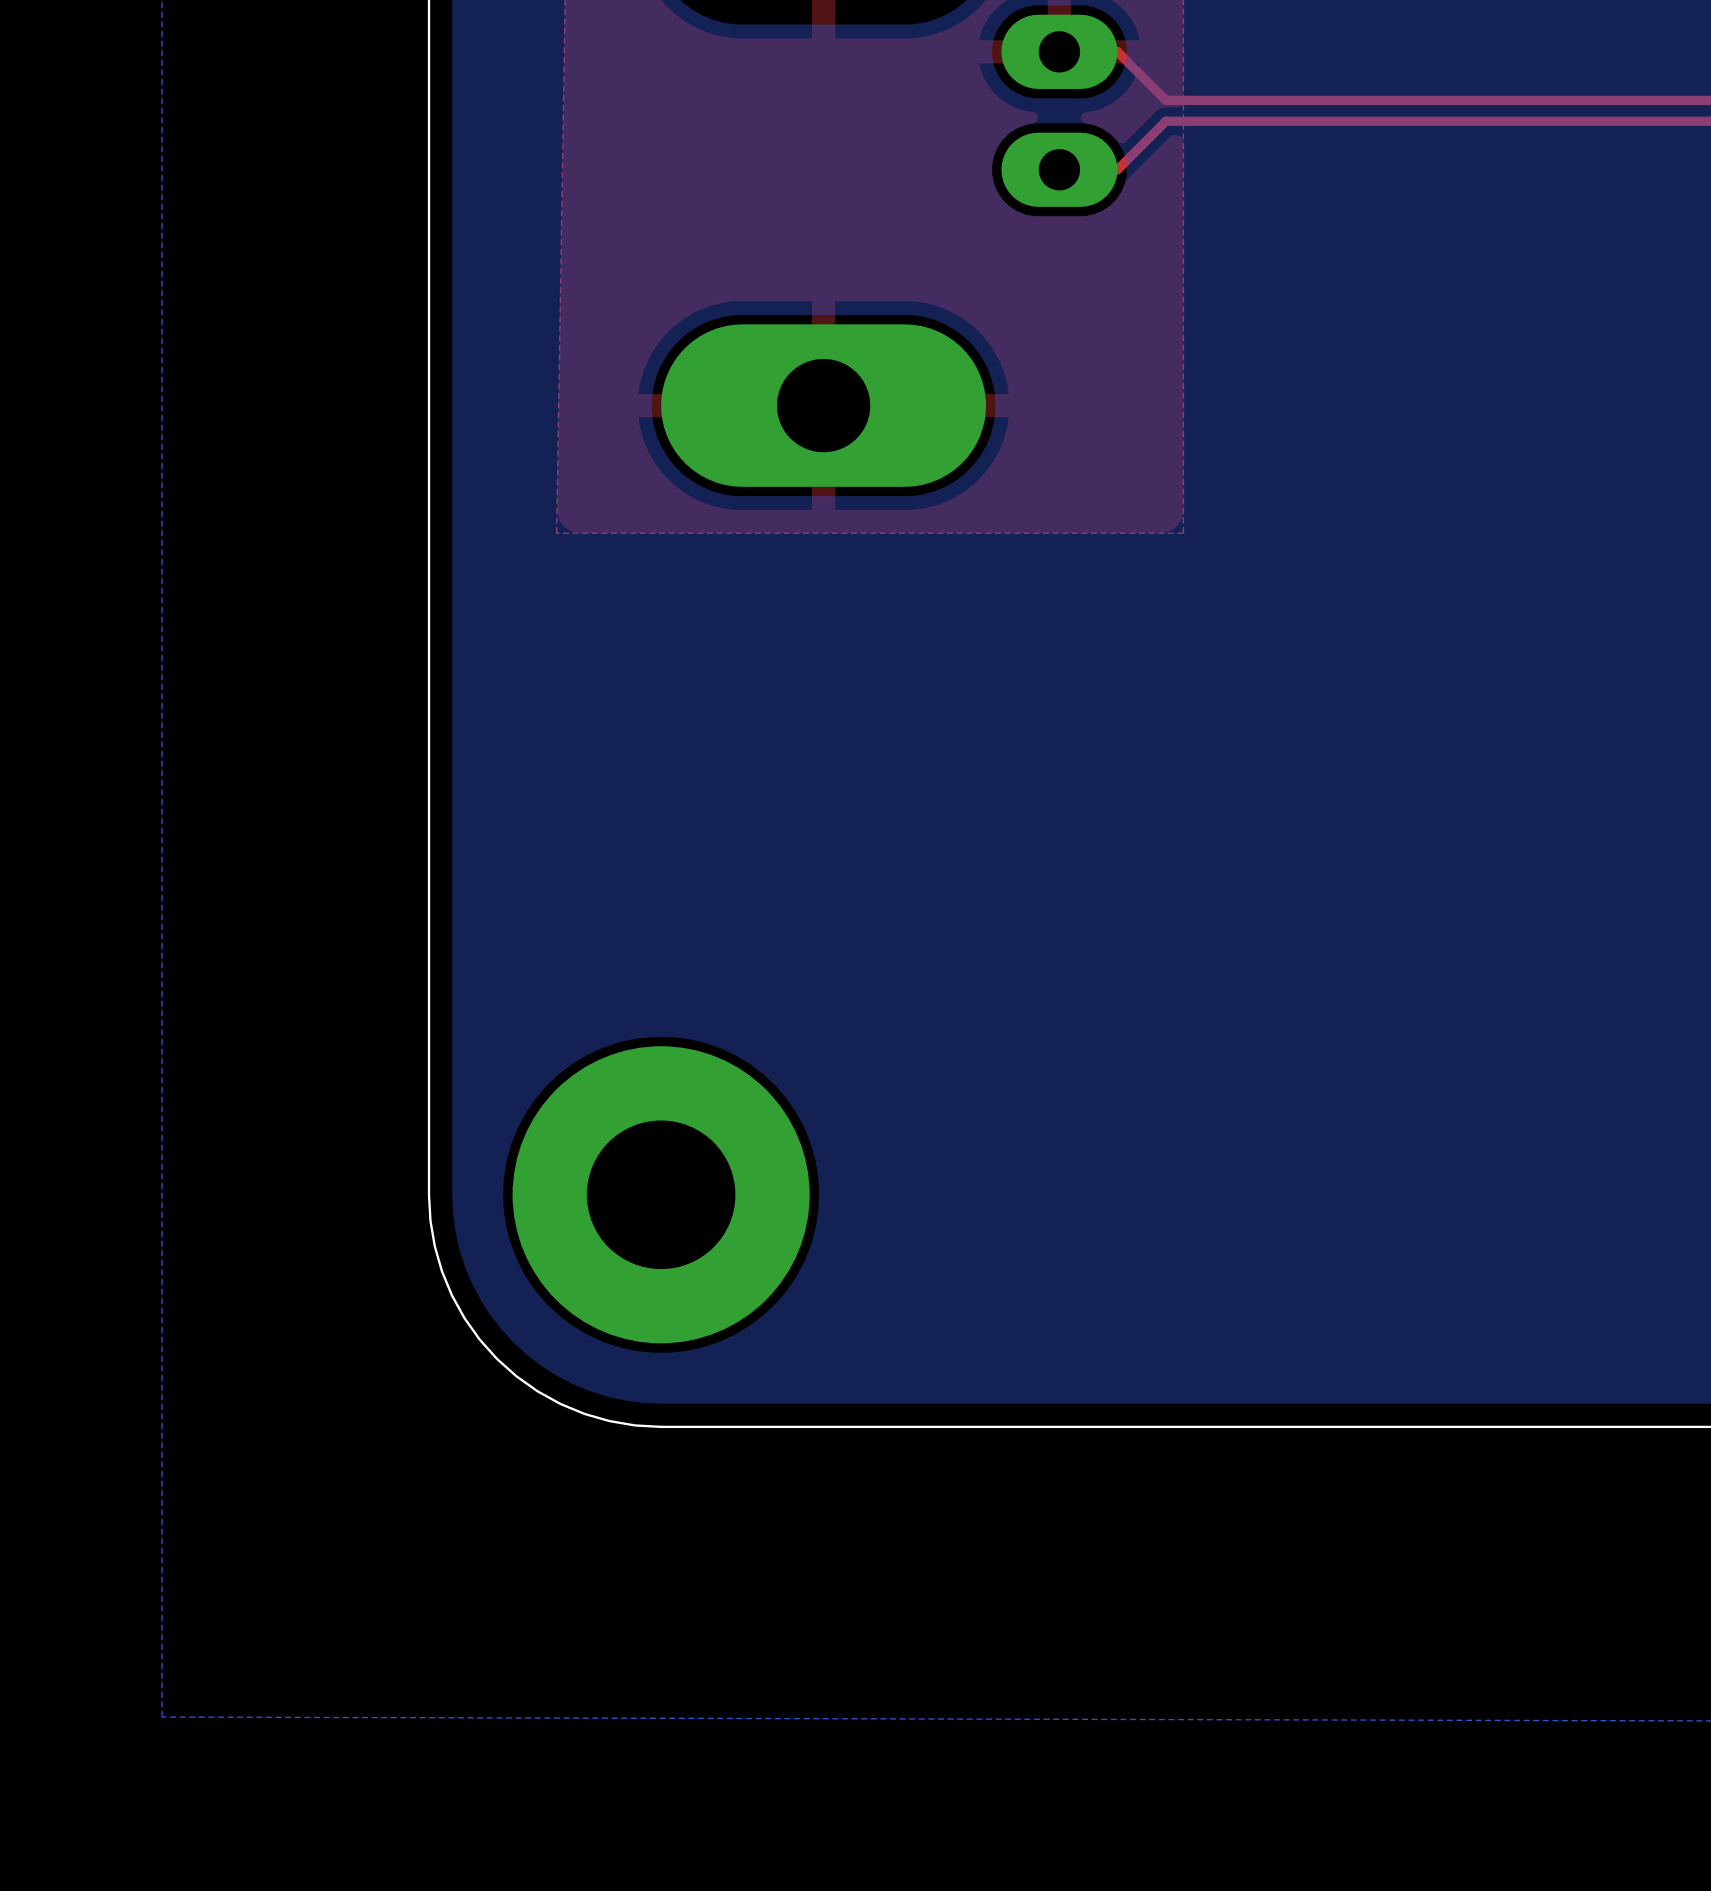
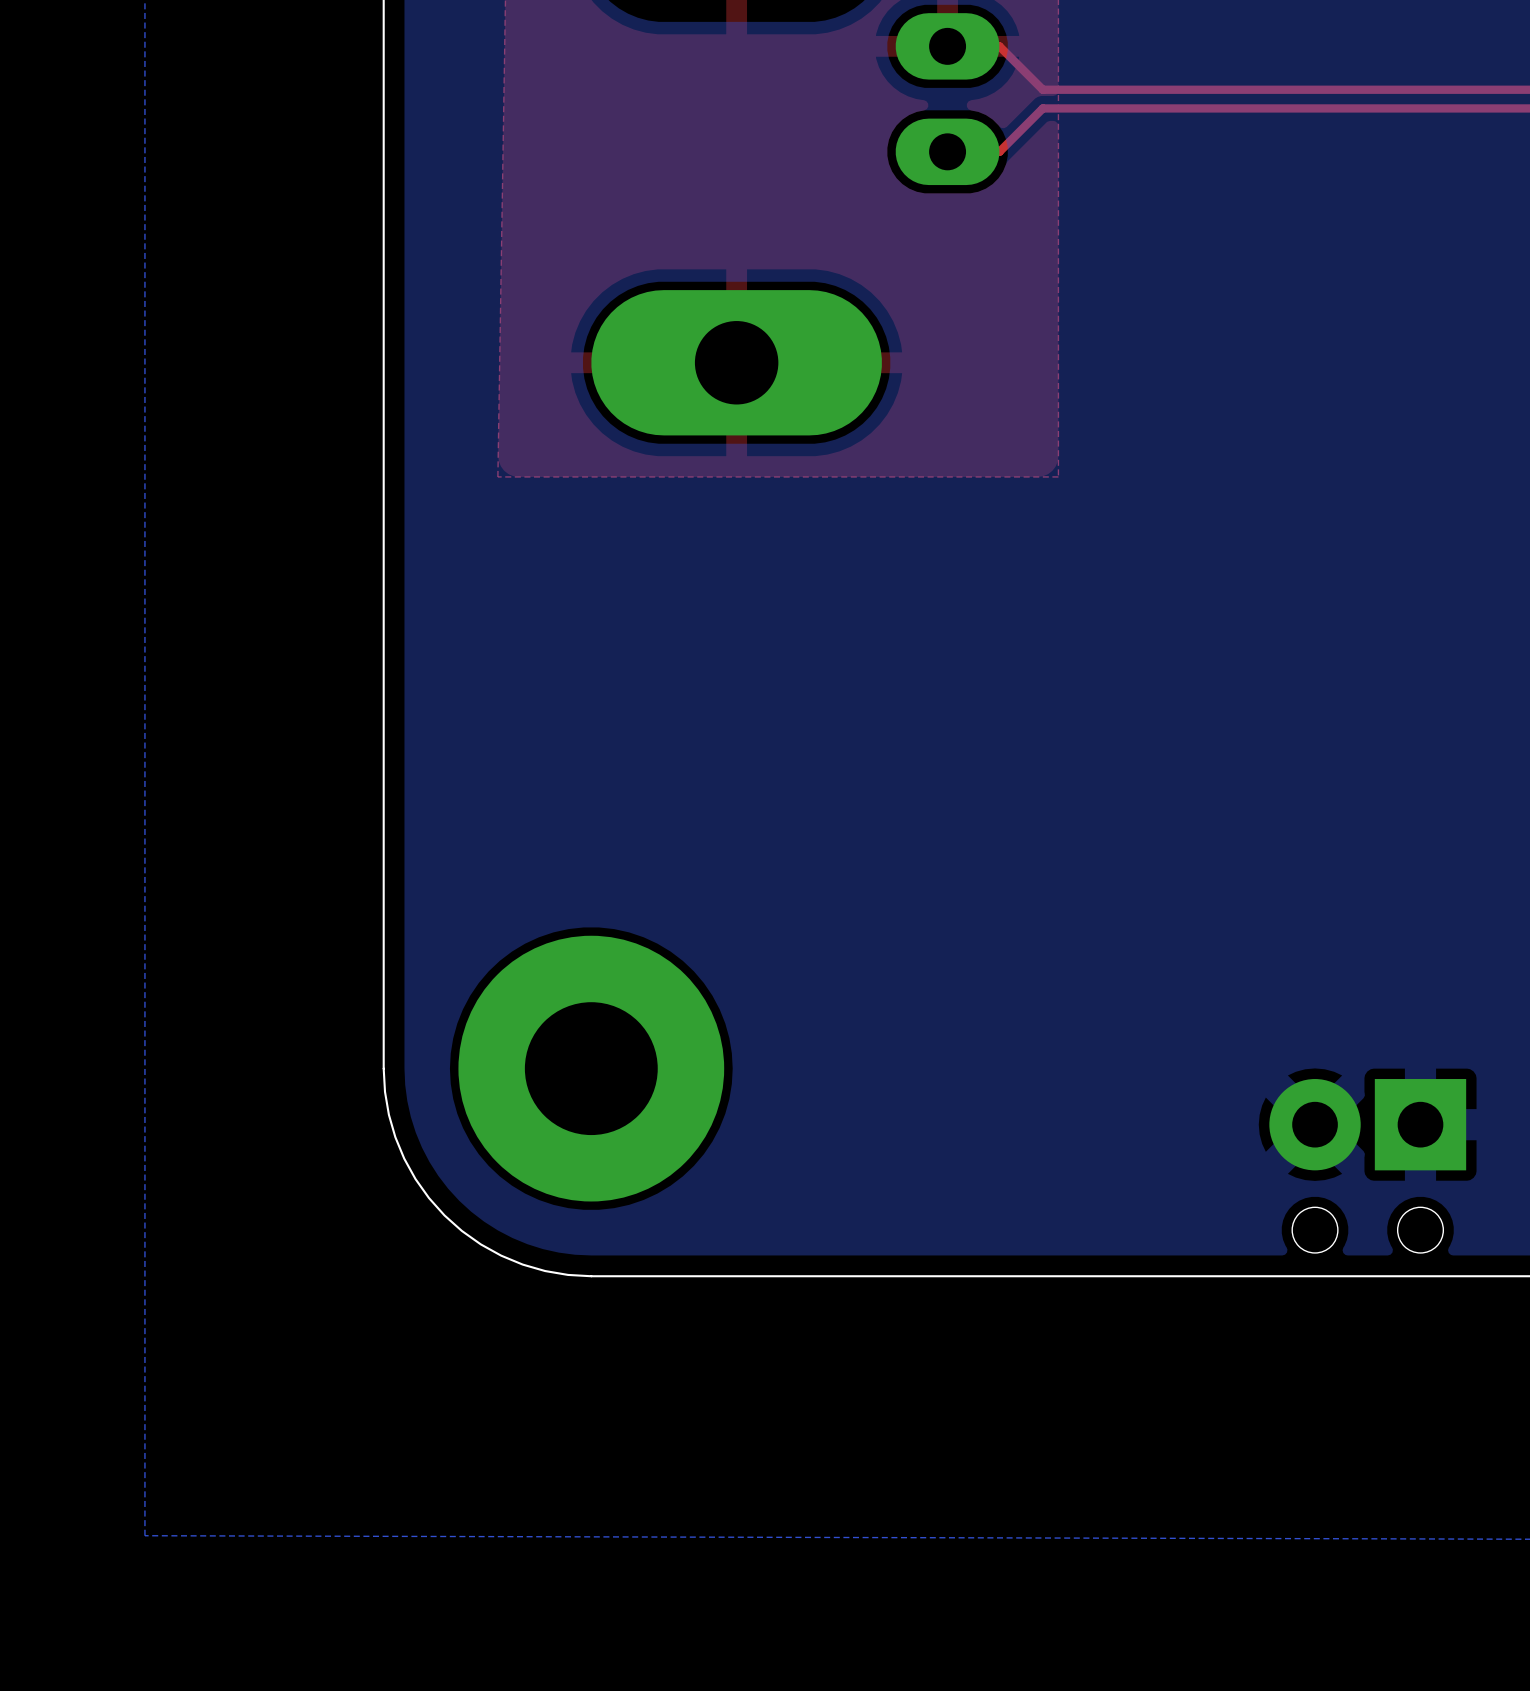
part: none -> (1367, 1165)

